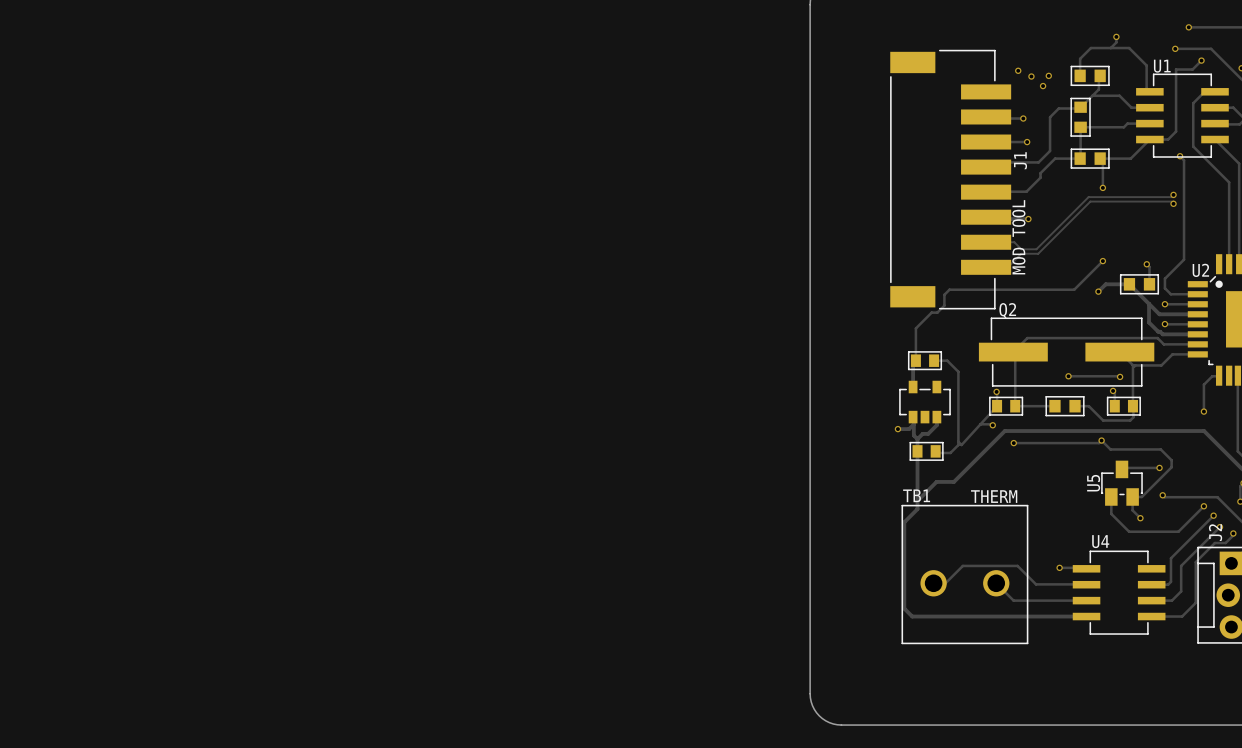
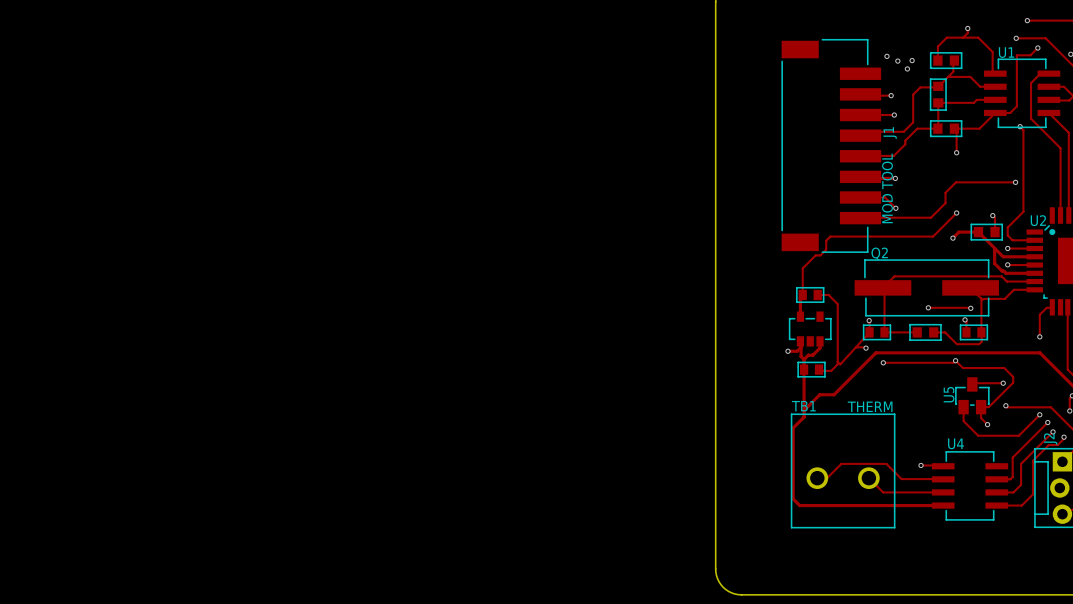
track: (1173, 194) (1173, 197) (1088, 197) (1036, 249) (1021, 249) (1014, 242) -> (895, 208) (883, 197)
via: (1173, 194) -> none
track: (1173, 203) (1173, 201) (1090, 201) (1038, 253) (1021, 253) (1007, 267) (986, 267) -> none
via: (1173, 203) -> none
track: none -> (1015, 182) (955, 182) (945, 192) (945, 203) (930, 217) (859, 217)
via: none -> (1015, 182)
via: none -> (895, 208)

